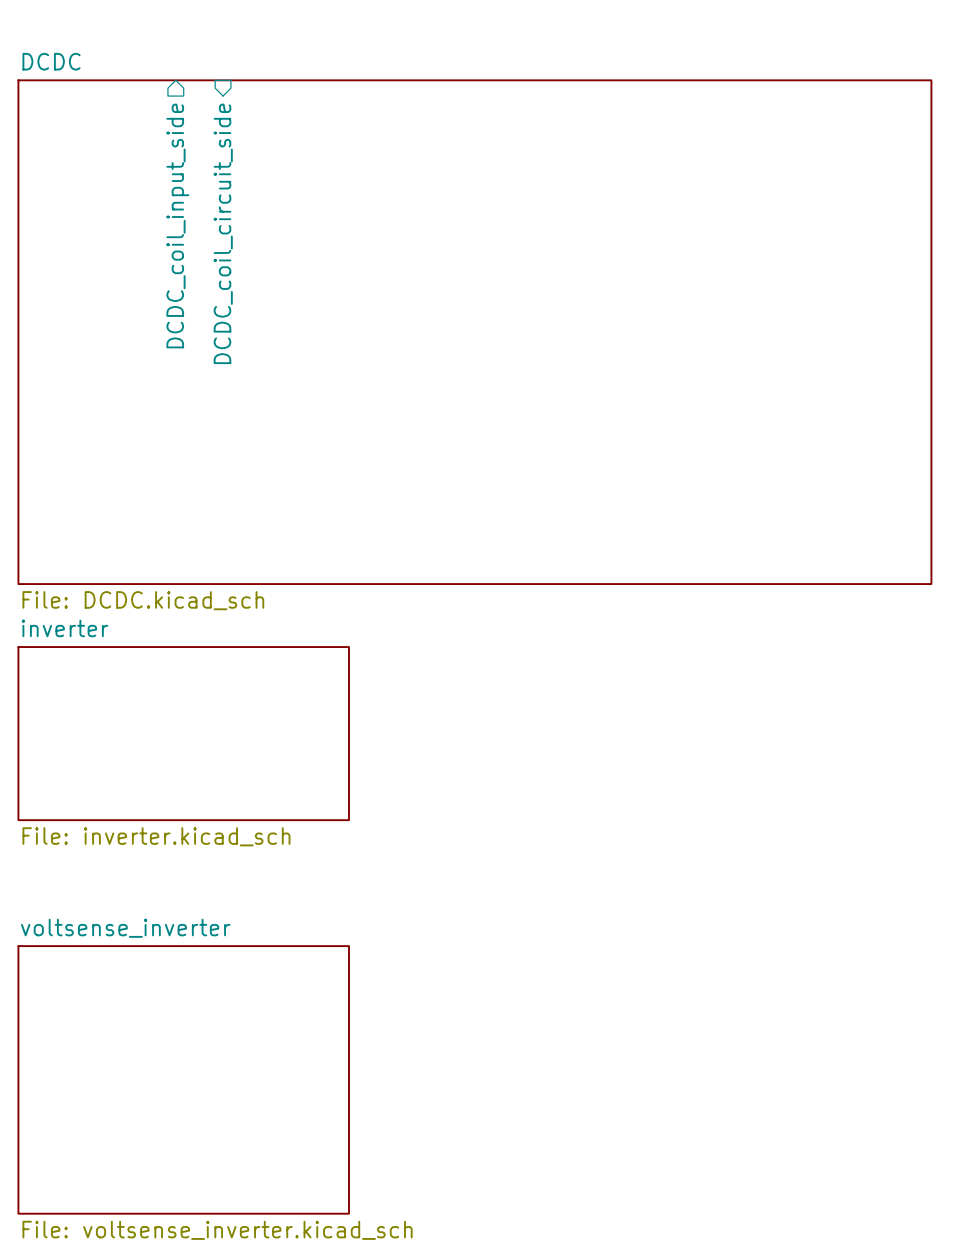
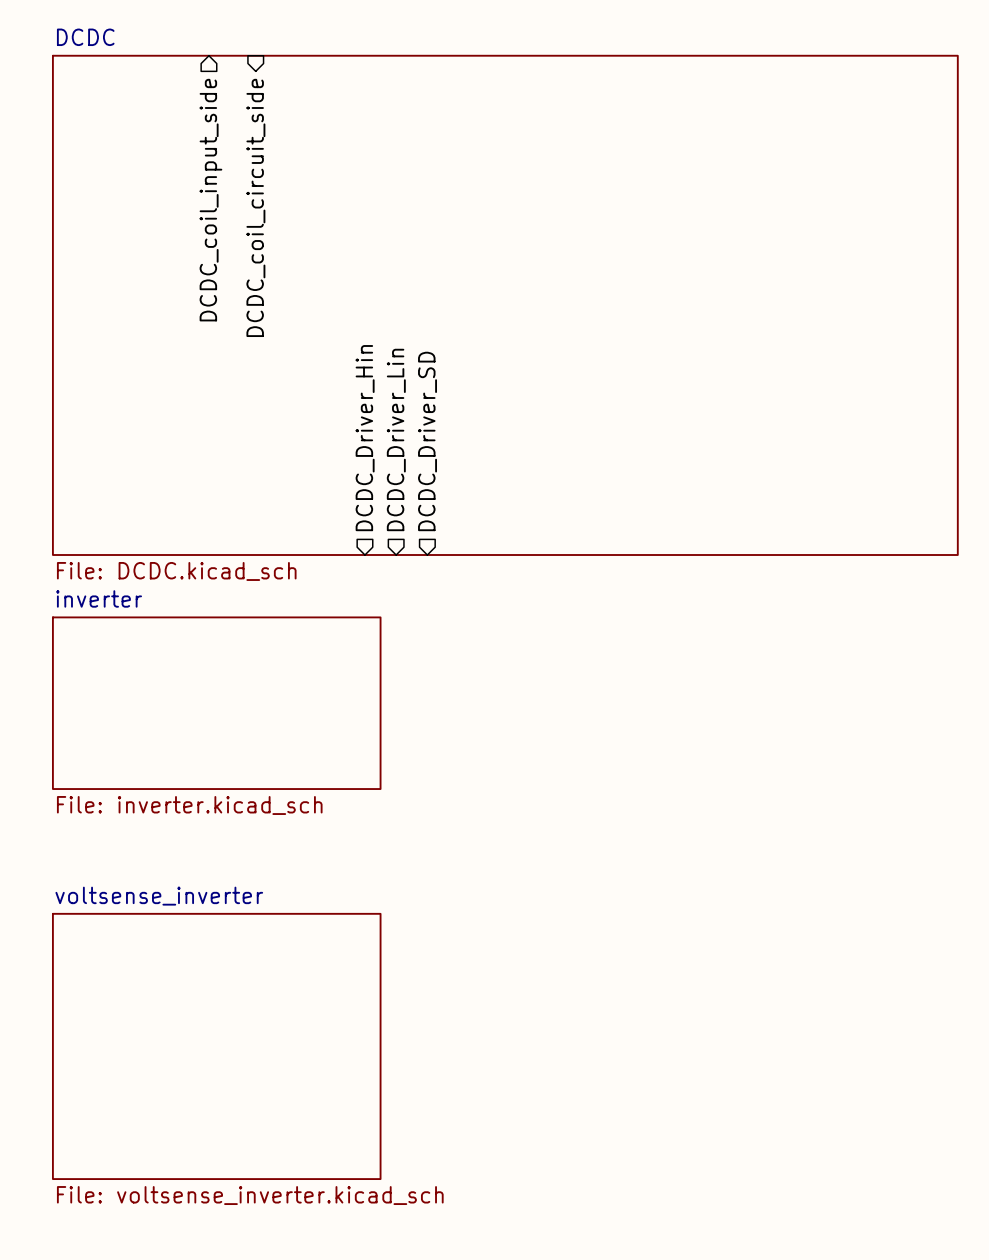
sheet pin: none -> DCDC_Driver_Hin (365, 438)
sheet pin: none -> DCDC_Driver_Lin (396, 439)
sheet pin: none -> DCDC_Driver_SD (427, 441)

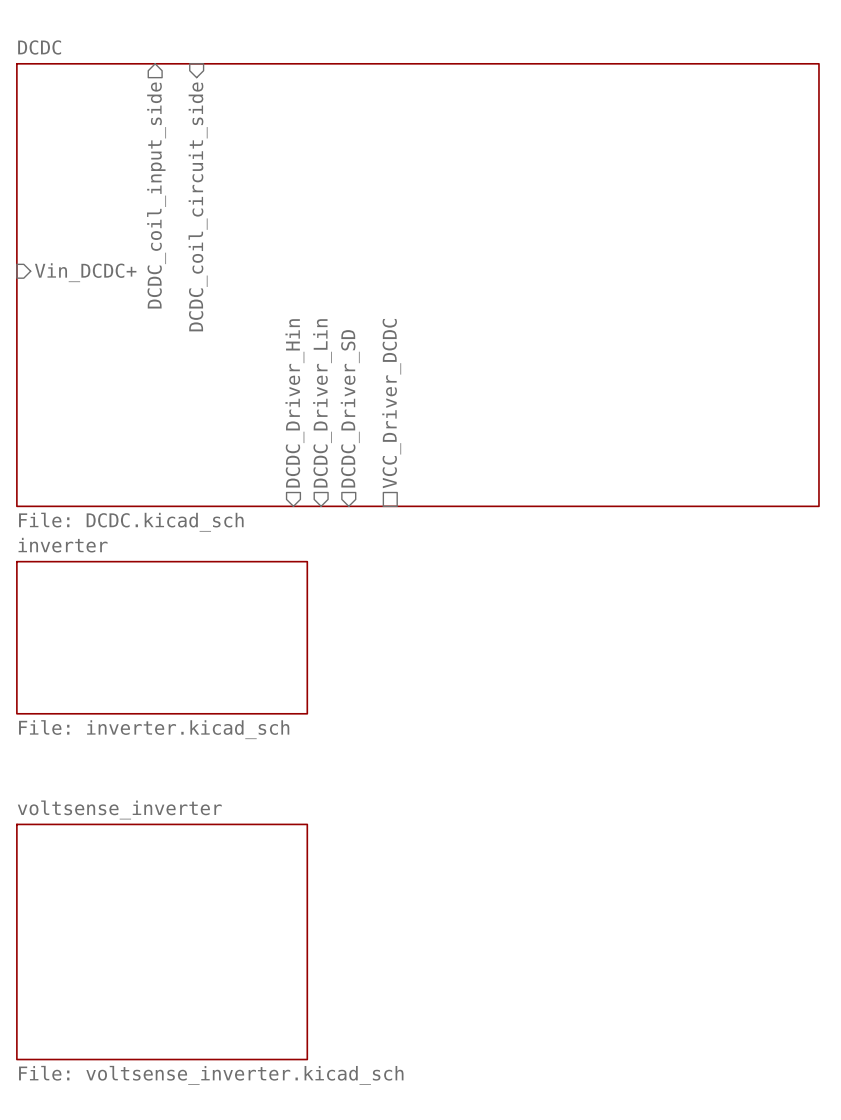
sheet pin: none -> Vin_DCDC+ (85, 272)
sheet pin: none -> VCC_Driver_DCDC (391, 403)

